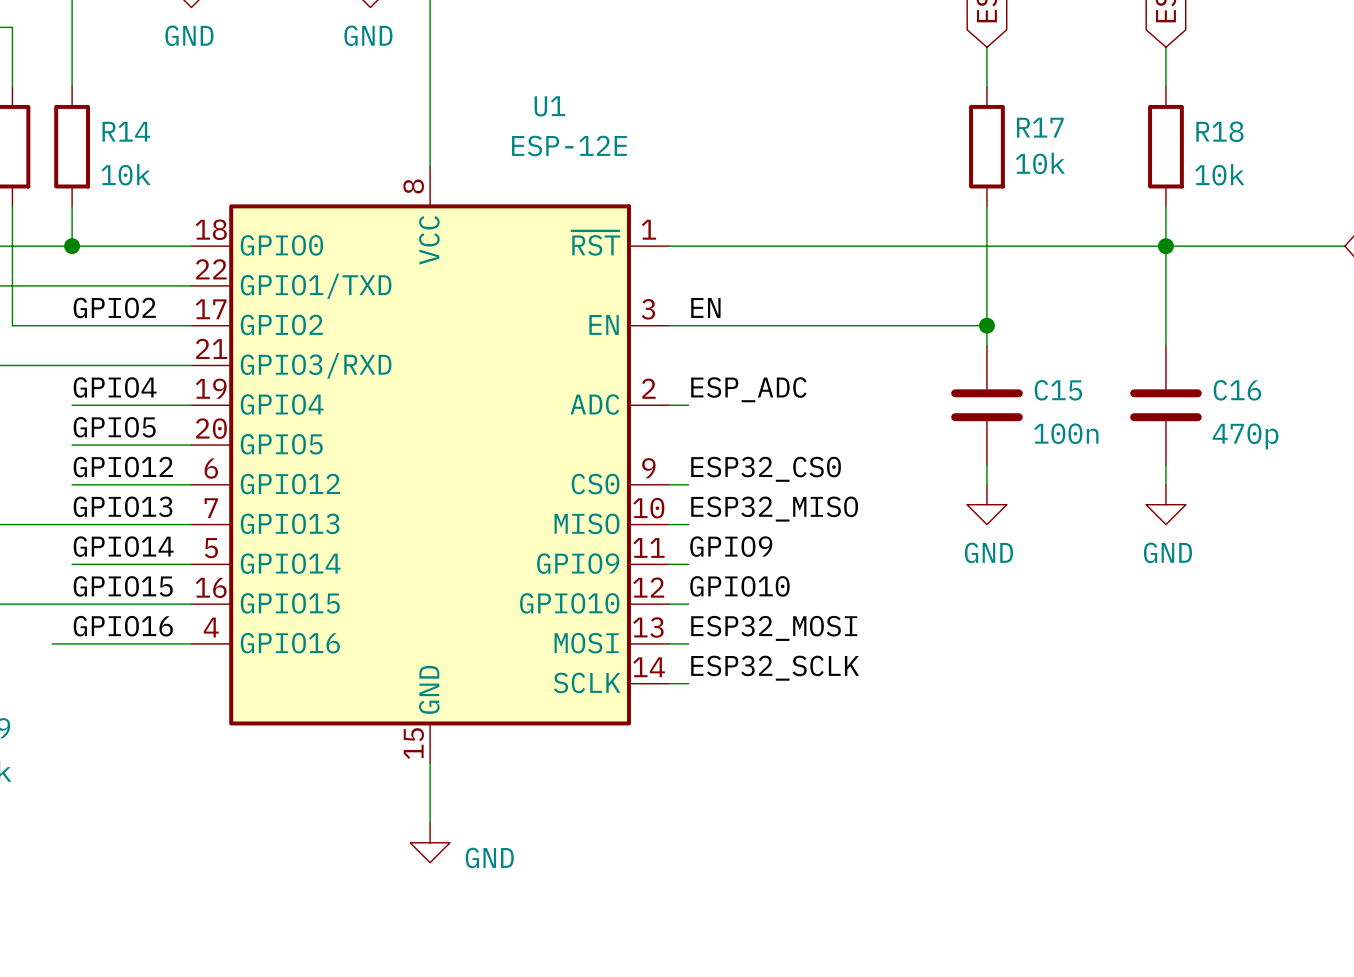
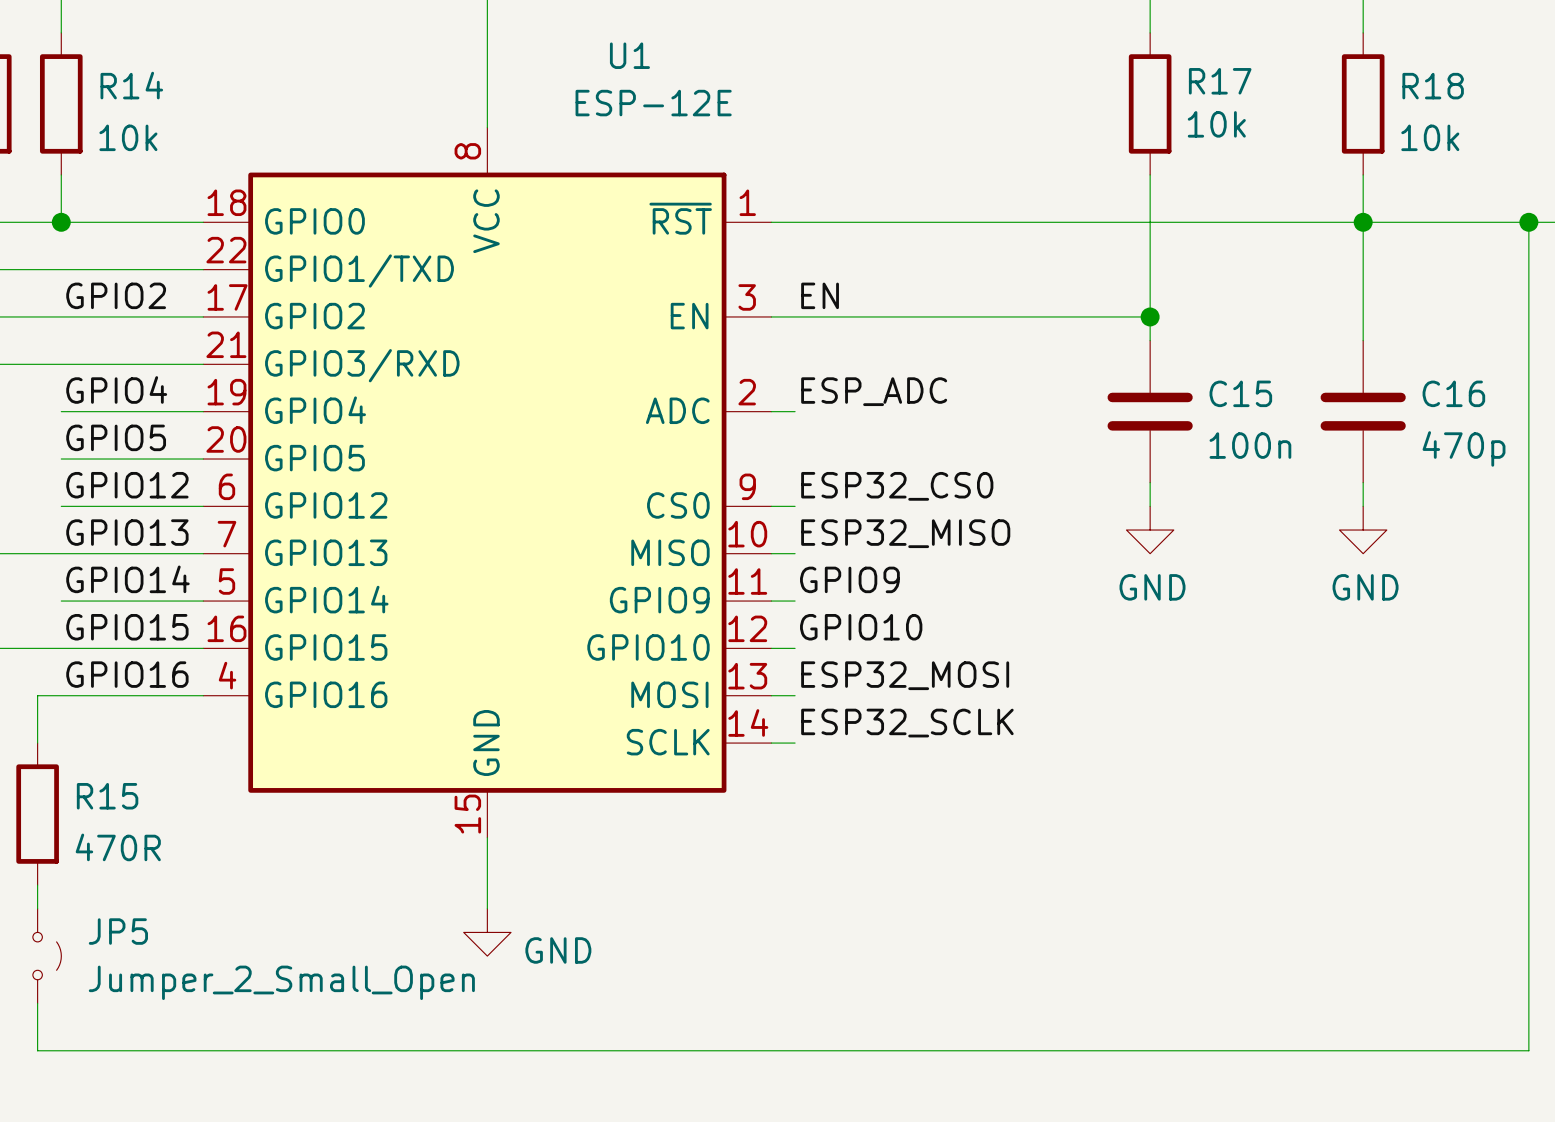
wire: none -> (1528, 222) (1528, 1050) (37, 1050) (37, 1003)
junction: none -> (1528, 222)
wire: none -> (37, 695) (37, 743)
R15: none -> 470R (37, 814)
wire: none -> (37, 885) (37, 908)
JP5: none -> Jumper_2_Small_Open (47, 956)

